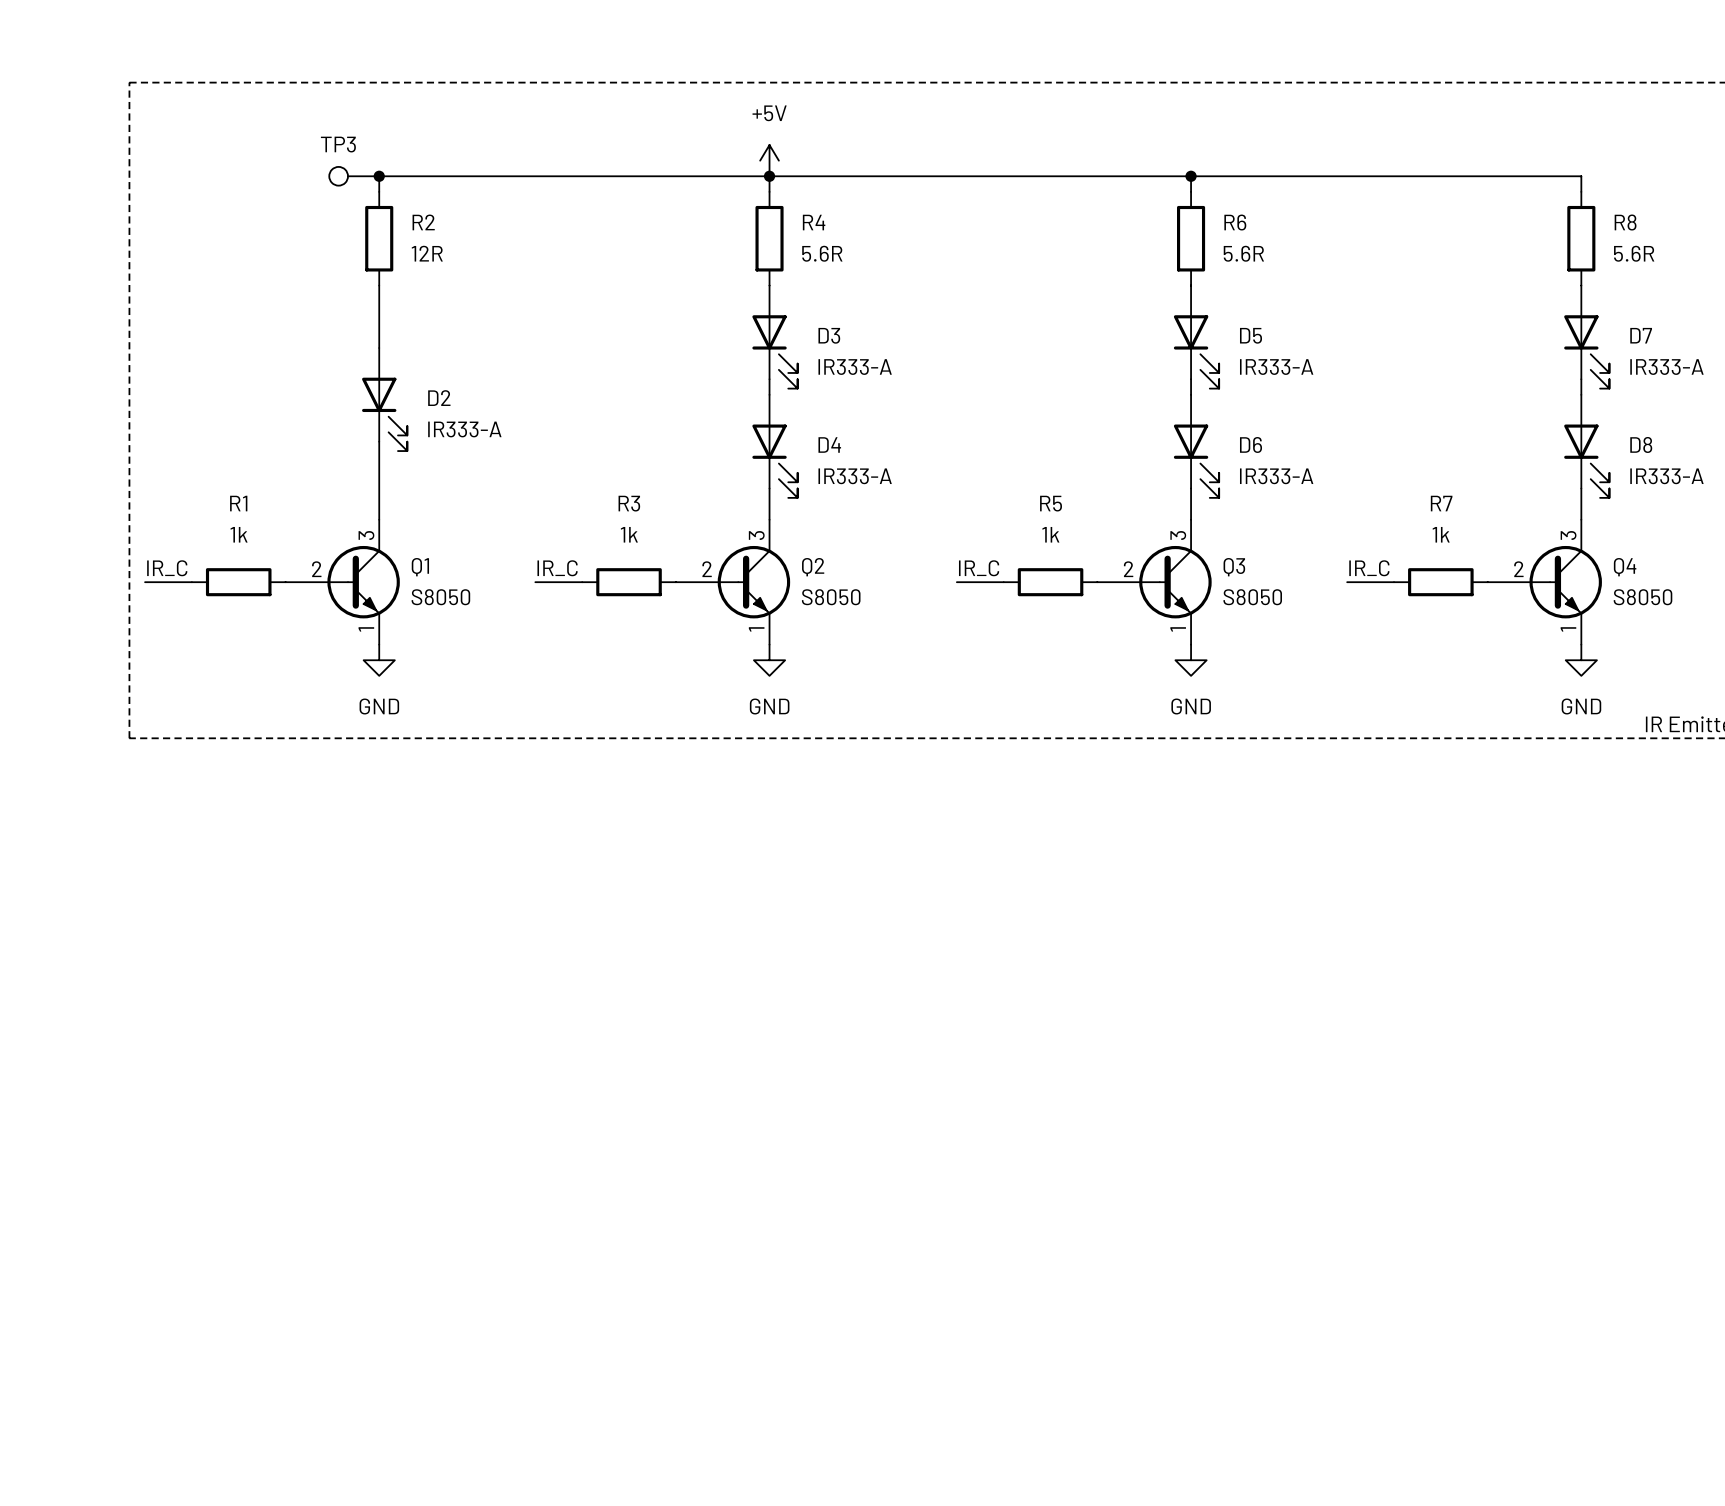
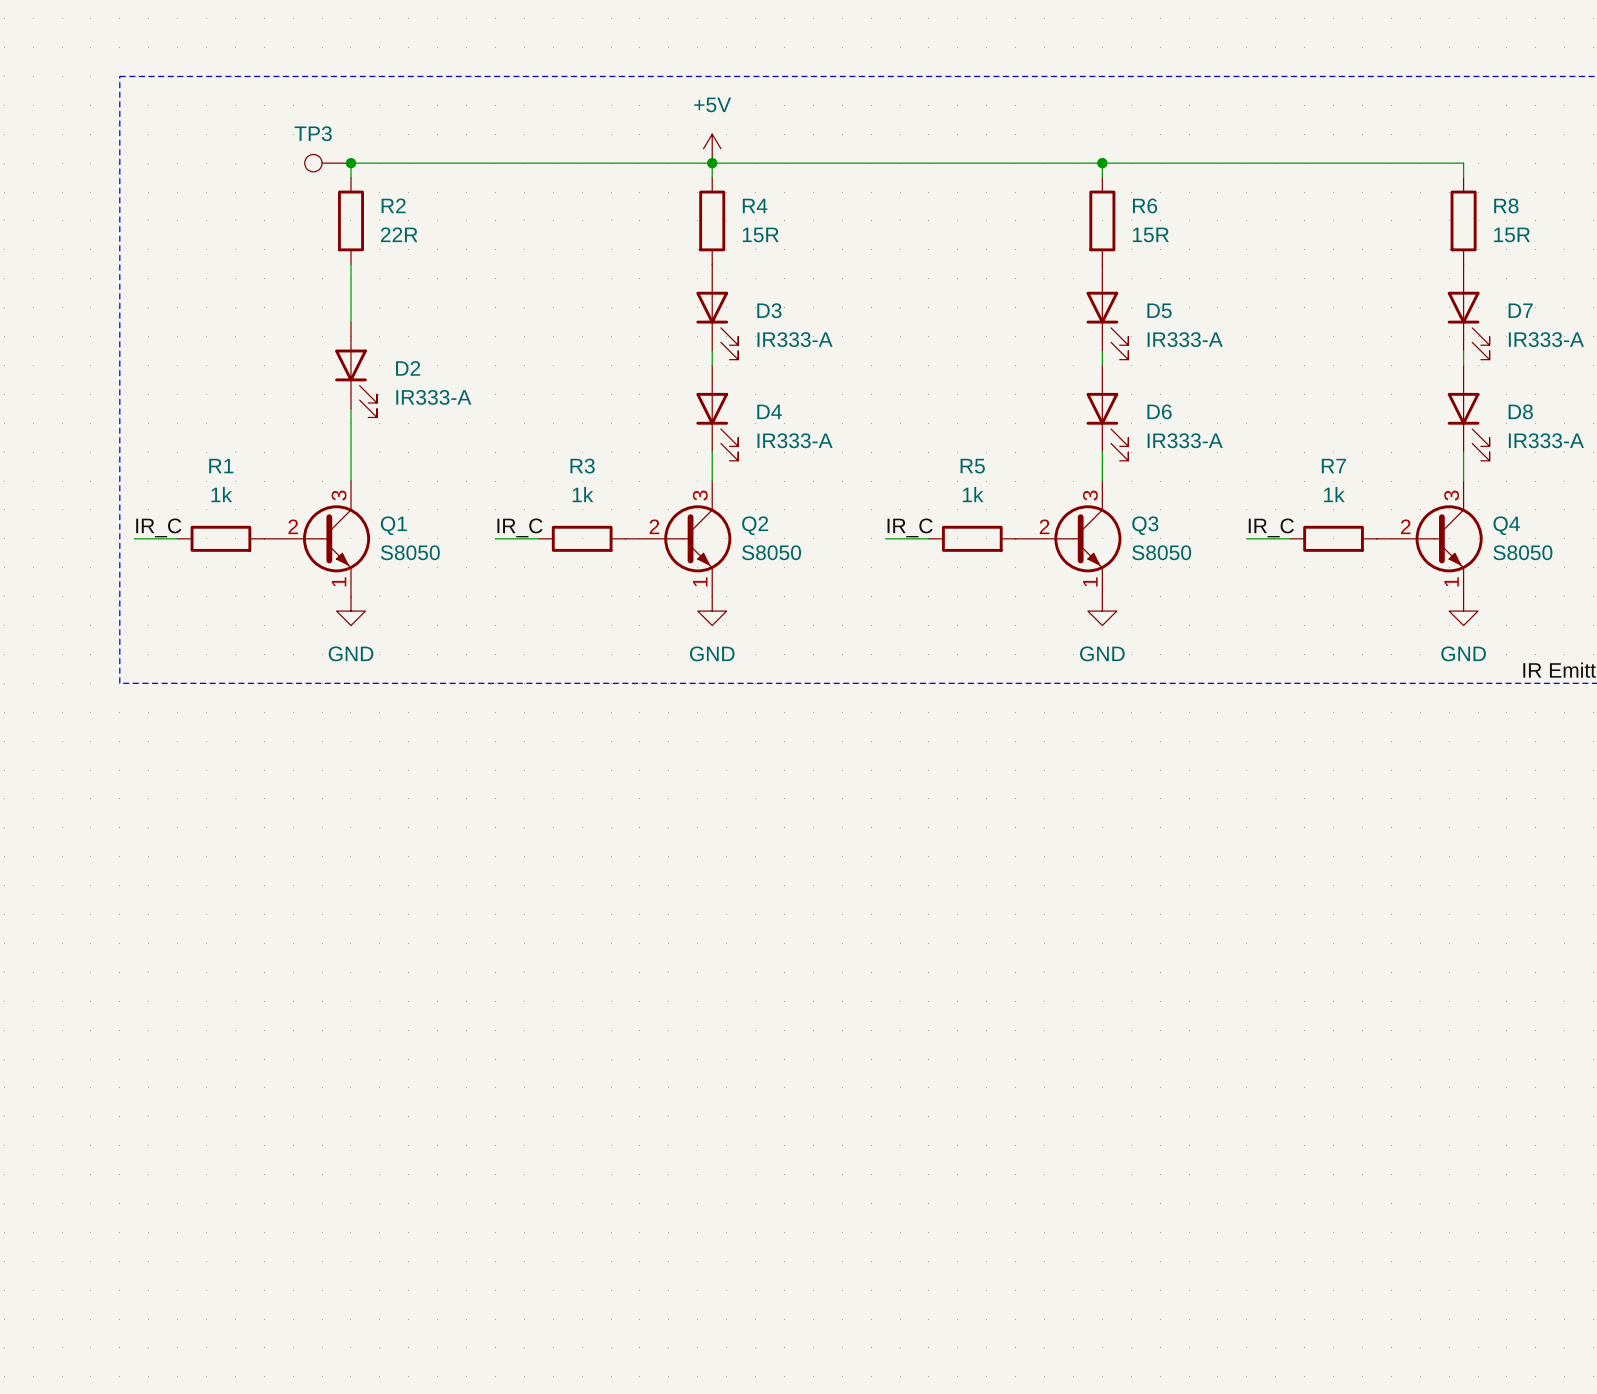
R2 value: 12R (427, 253) -> 22R (399, 234)
R4 value: 5.6R (822, 253) -> 15R (760, 234)
R6 value: 5.6R (1243, 253) -> 15R (1150, 234)
R8 value: 5.6R (1634, 253) -> 15R (1512, 234)

